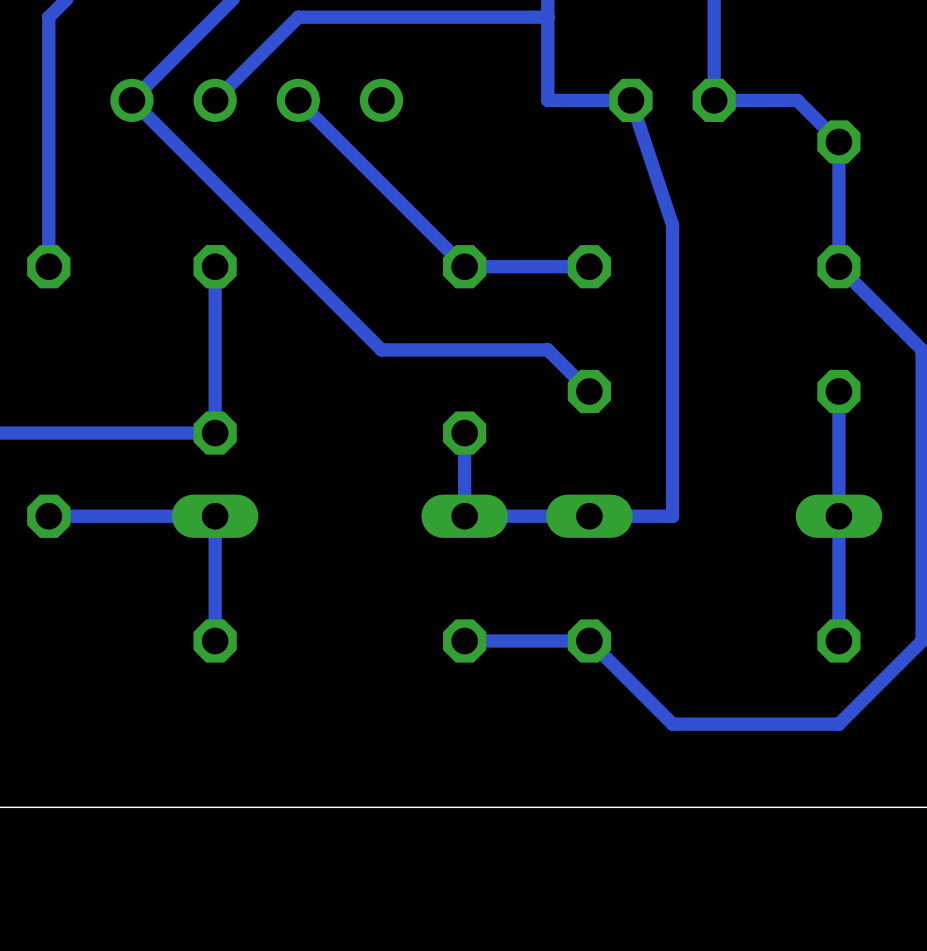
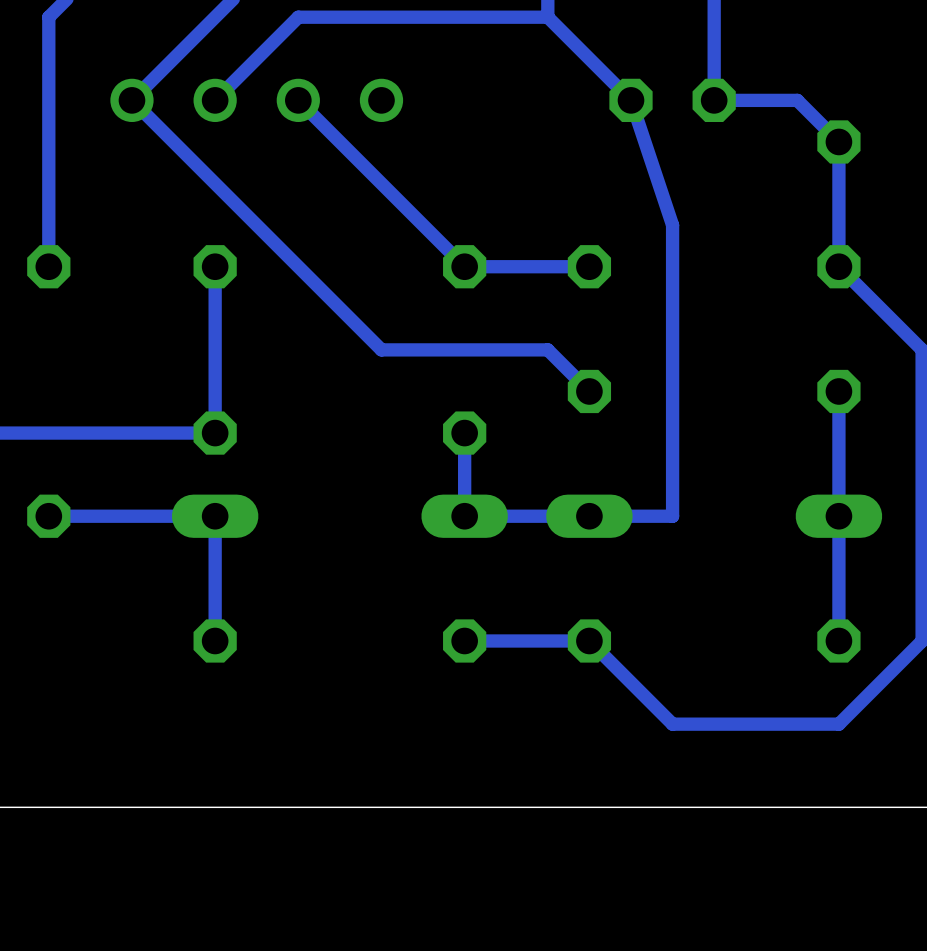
track: (547, 17) (547, 100) (631, 100) -> (547, 17) (631, 100)

